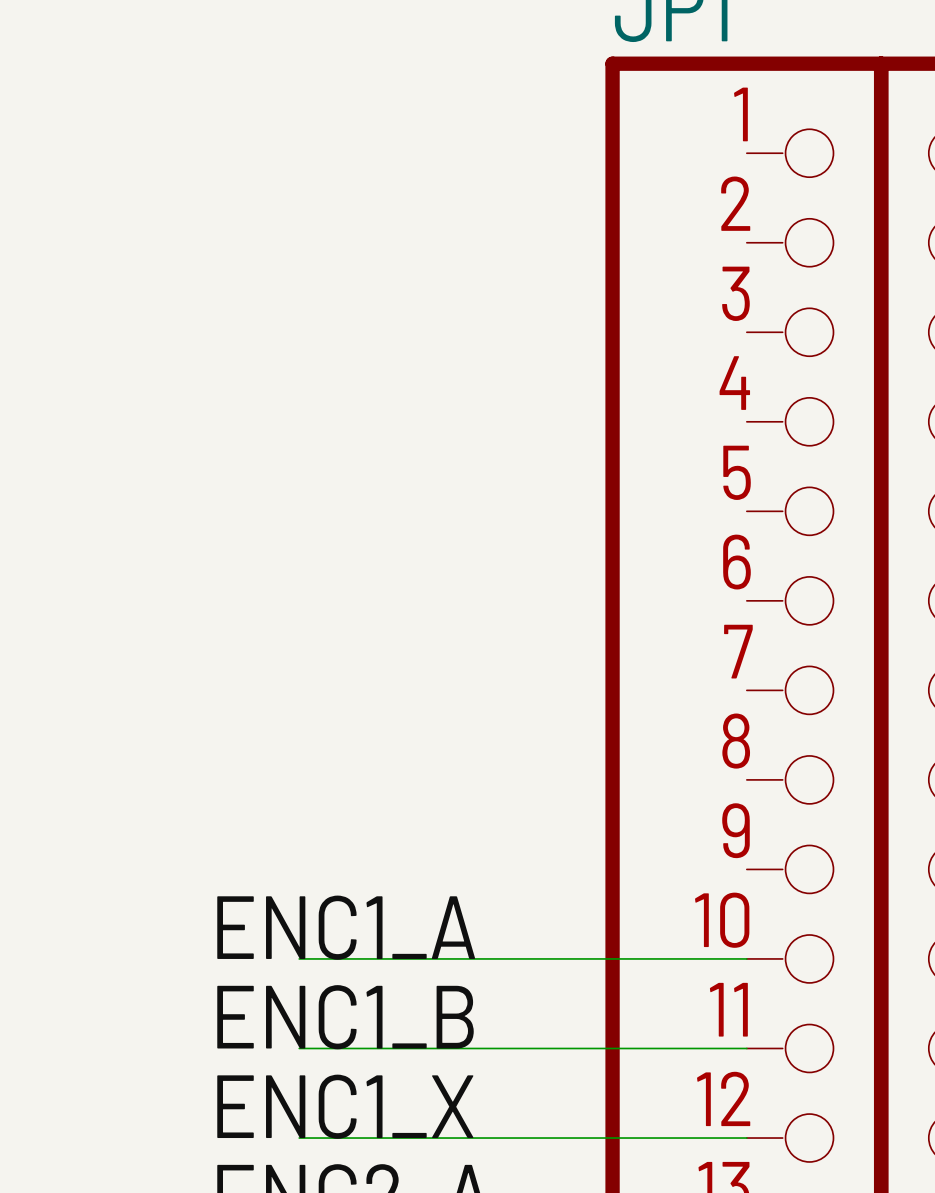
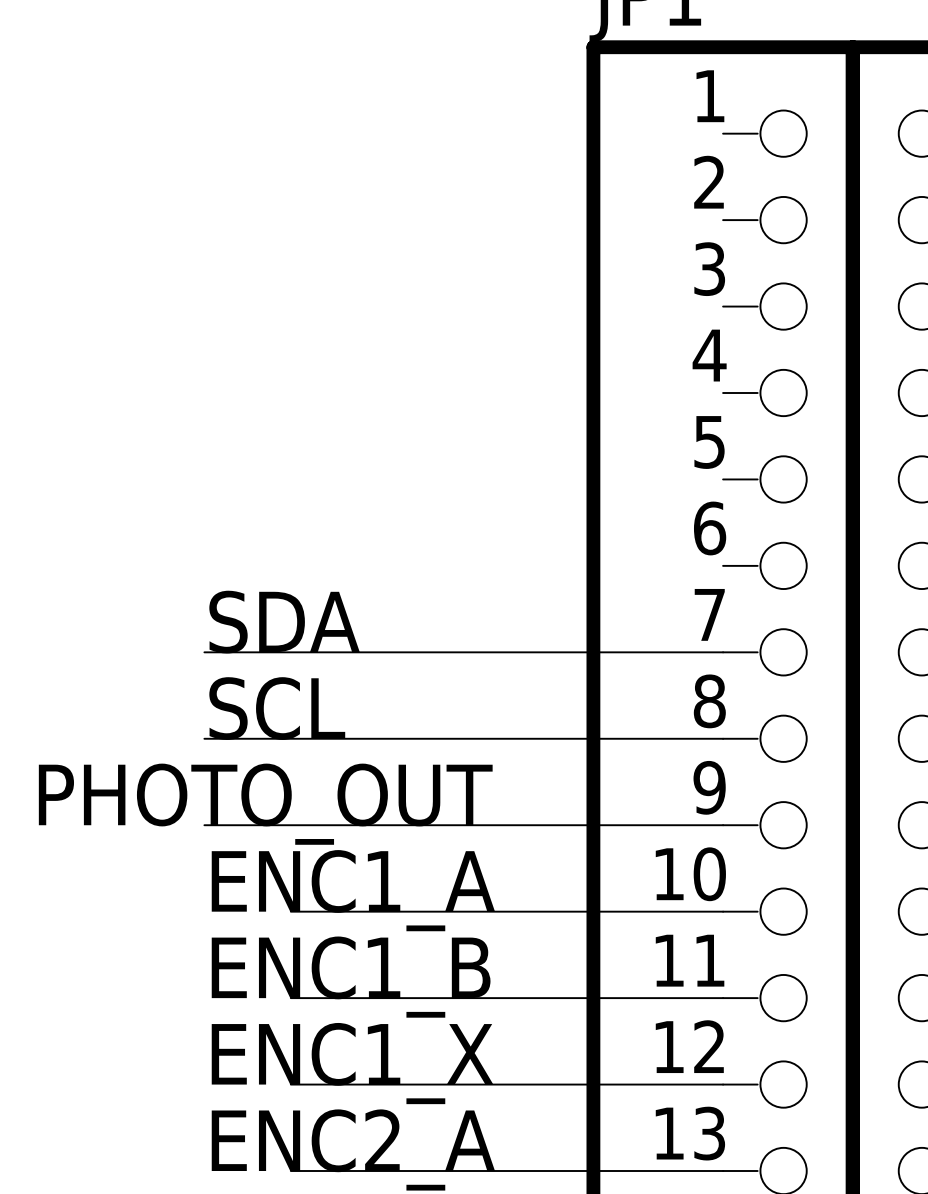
label: none -> SDA (284, 622)
wire: none -> (204, 652) (723, 652)
label: none -> SCL (277, 708)
wire: none -> (204, 738) (723, 738)
label: none -> PHOTO_OUT (265, 804)
wire: none -> (204, 825) (723, 825)

